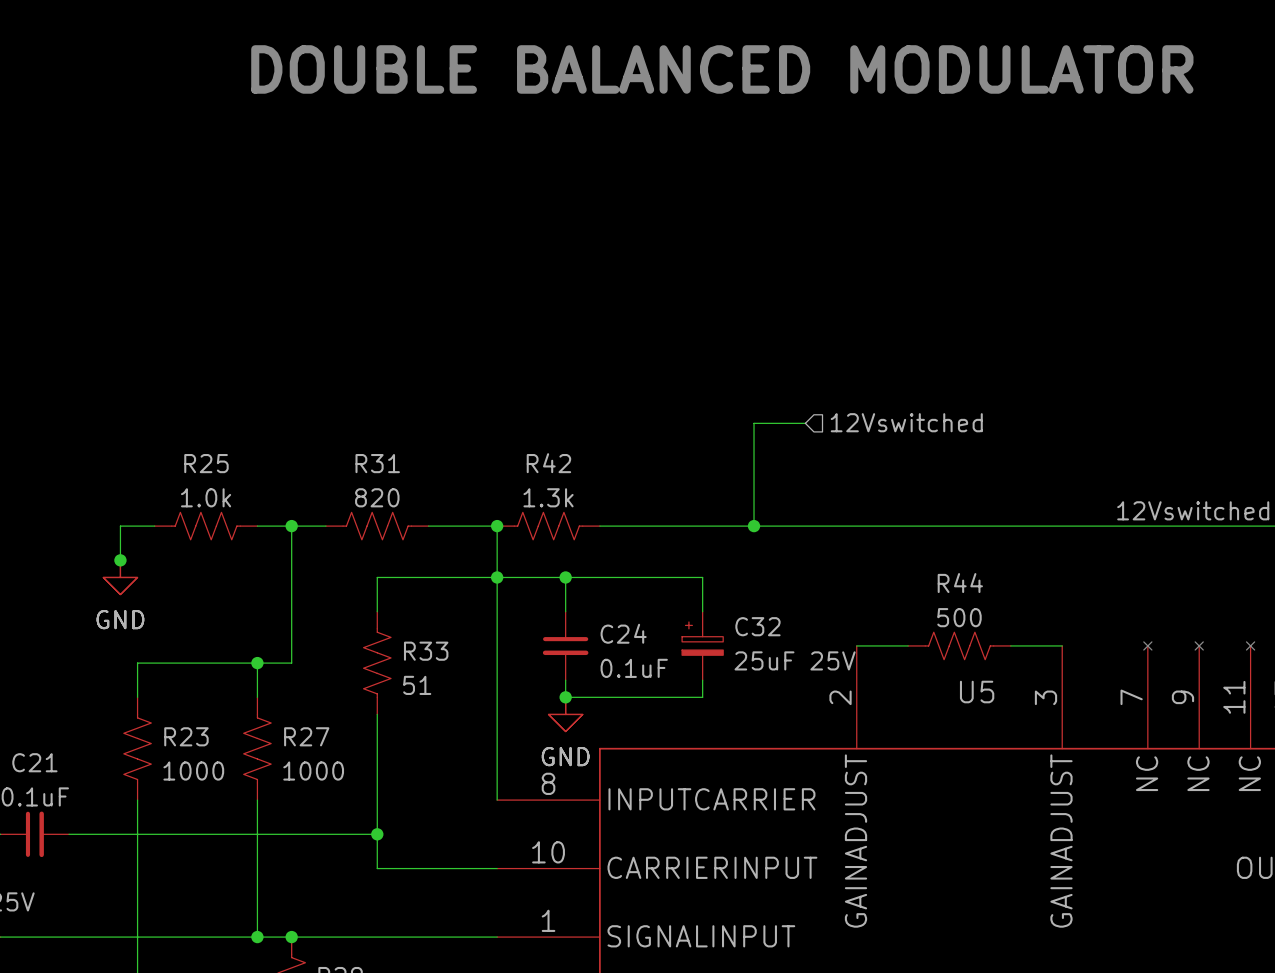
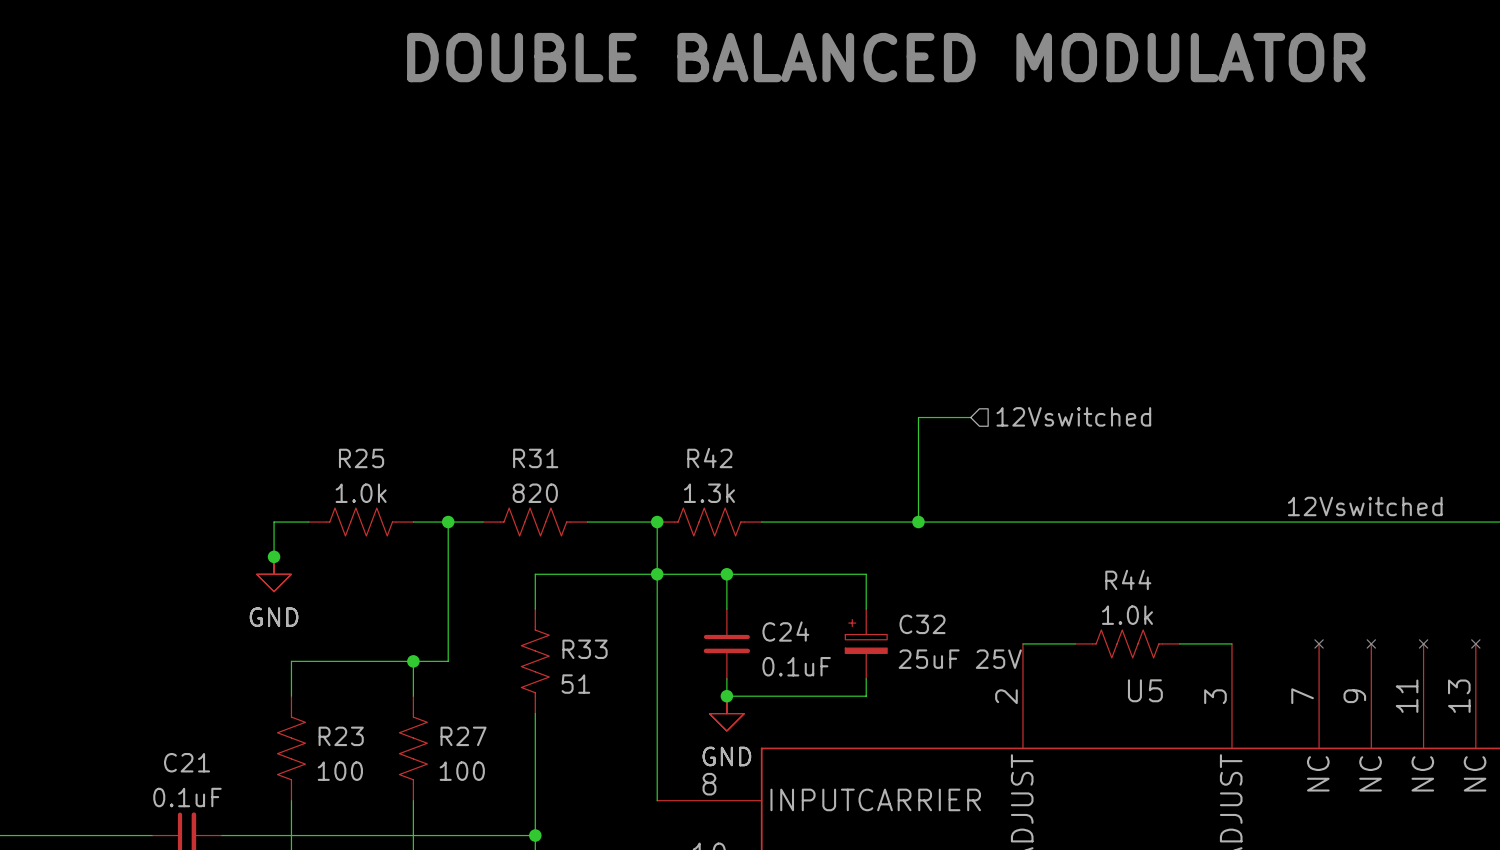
R44 value: 500 (959, 617) -> 1.0k (1127, 615)
R23 value: 1000 (193, 771) -> 100 (340, 771)
R27 value: 1000 (313, 771) -> 100 (462, 771)

